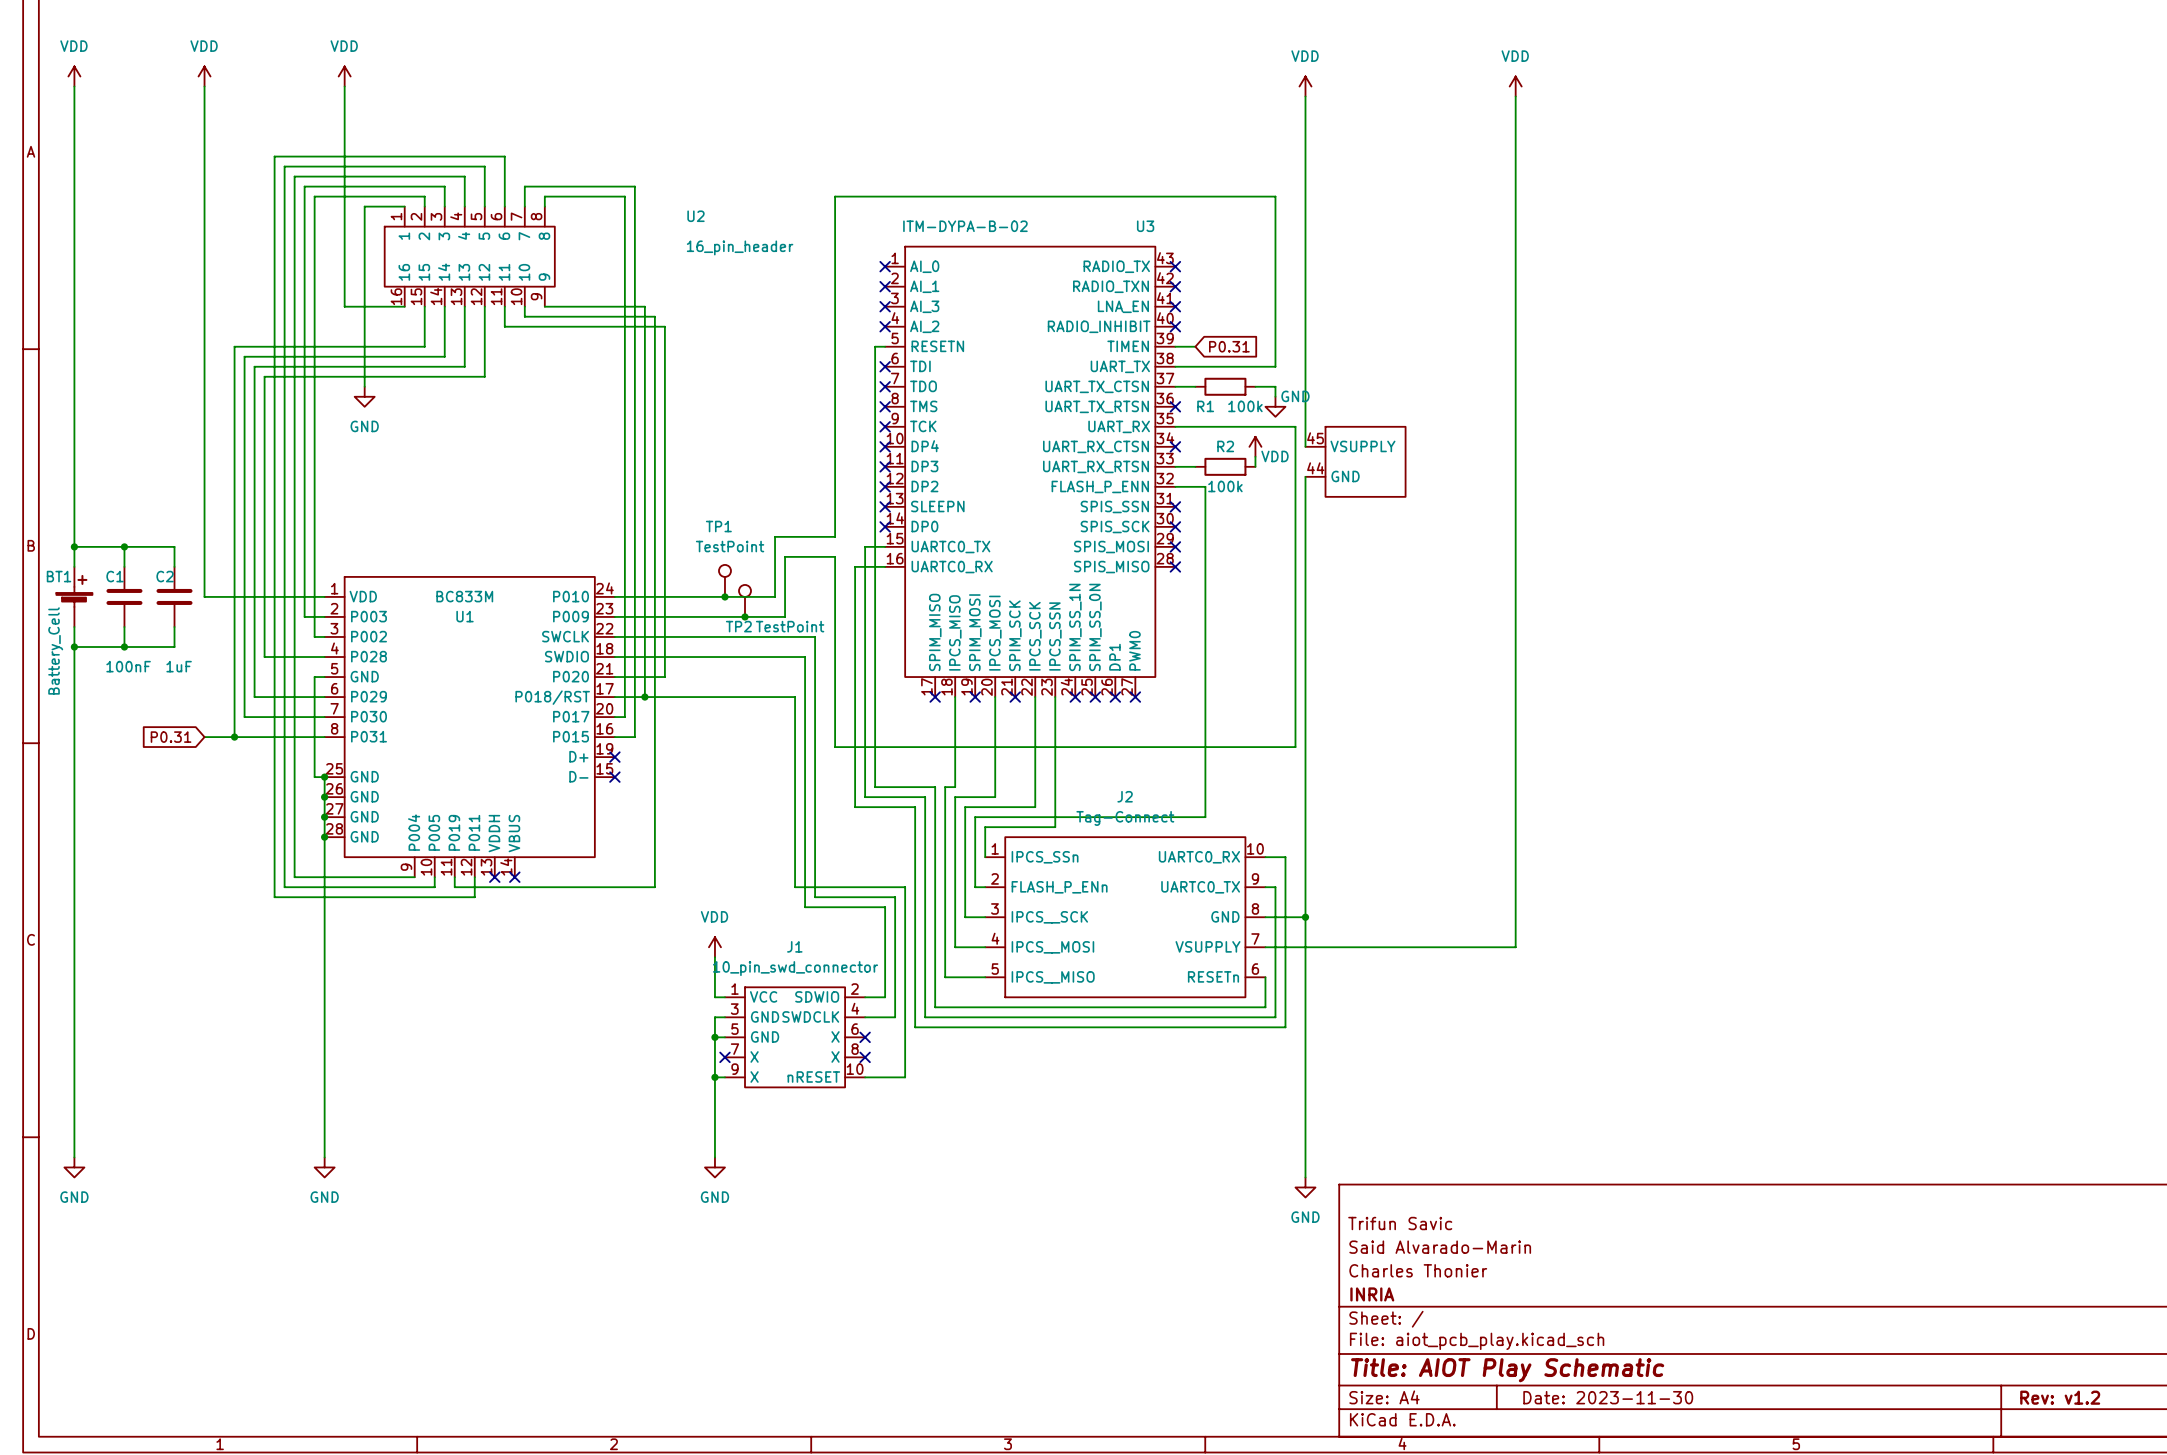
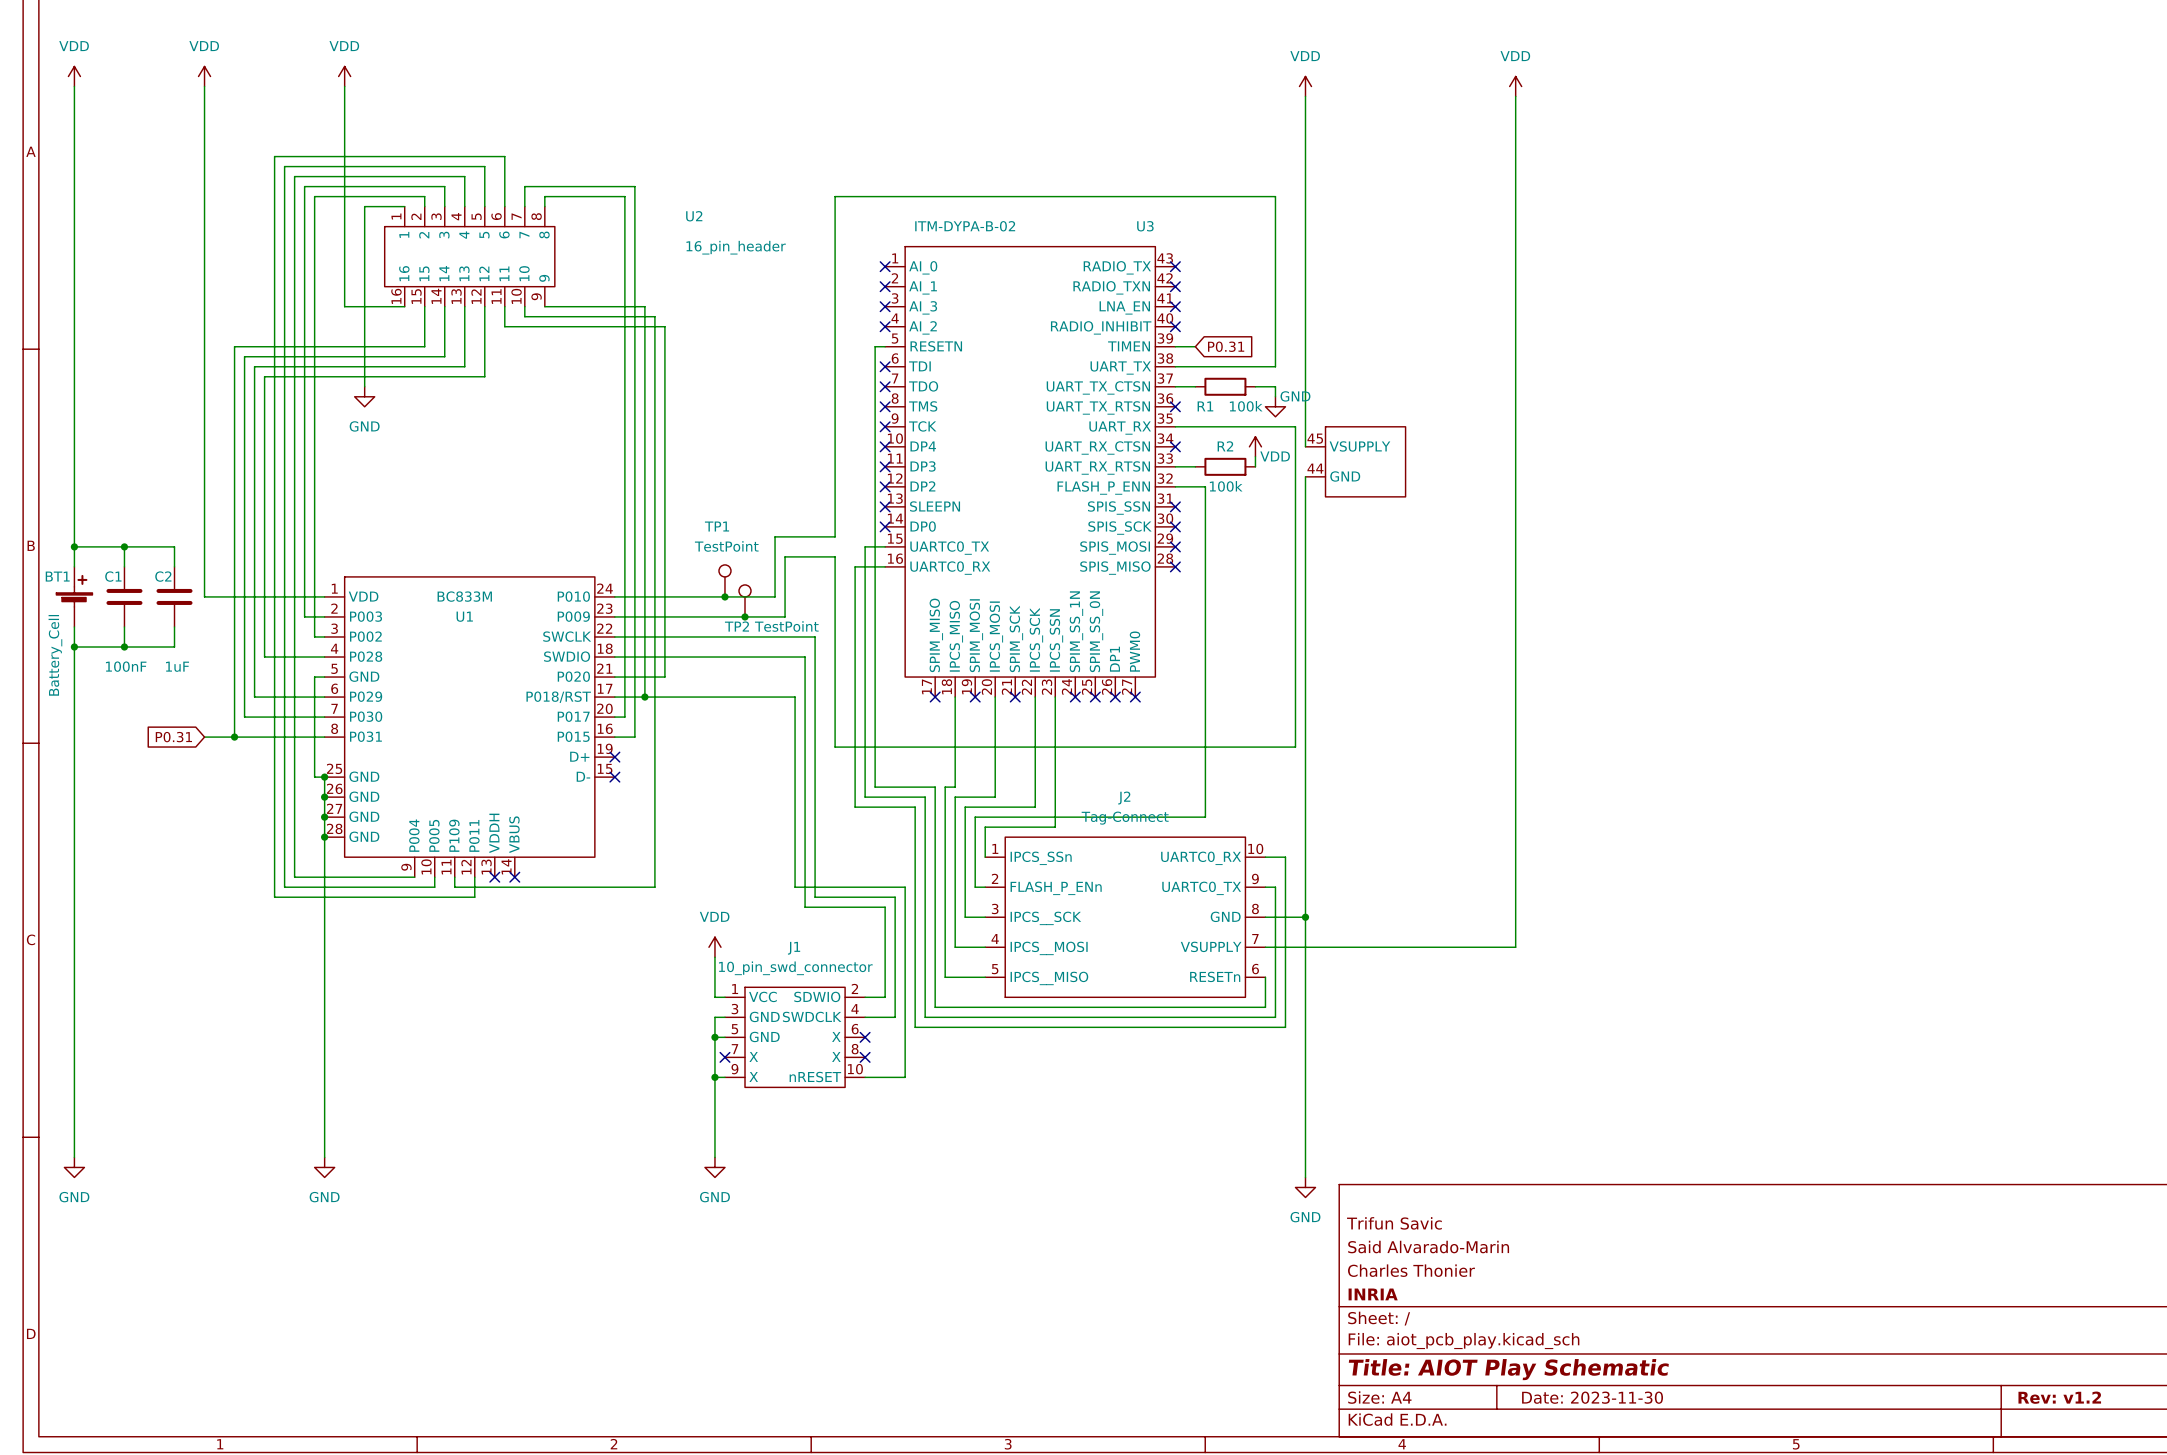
U1 pin name: P019 (454, 832) -> P109 (454, 835)

